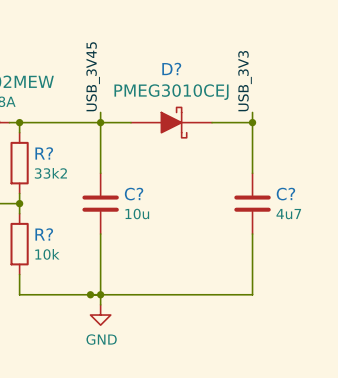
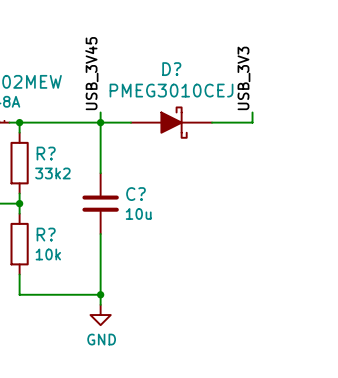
wire: (252, 122) (252, 173) -> none
junction: (252, 122) -> none
C?: (252, 203) -> none
wire: (252, 234) (252, 294) (100, 294) -> none
junction: (90, 294) -> none

